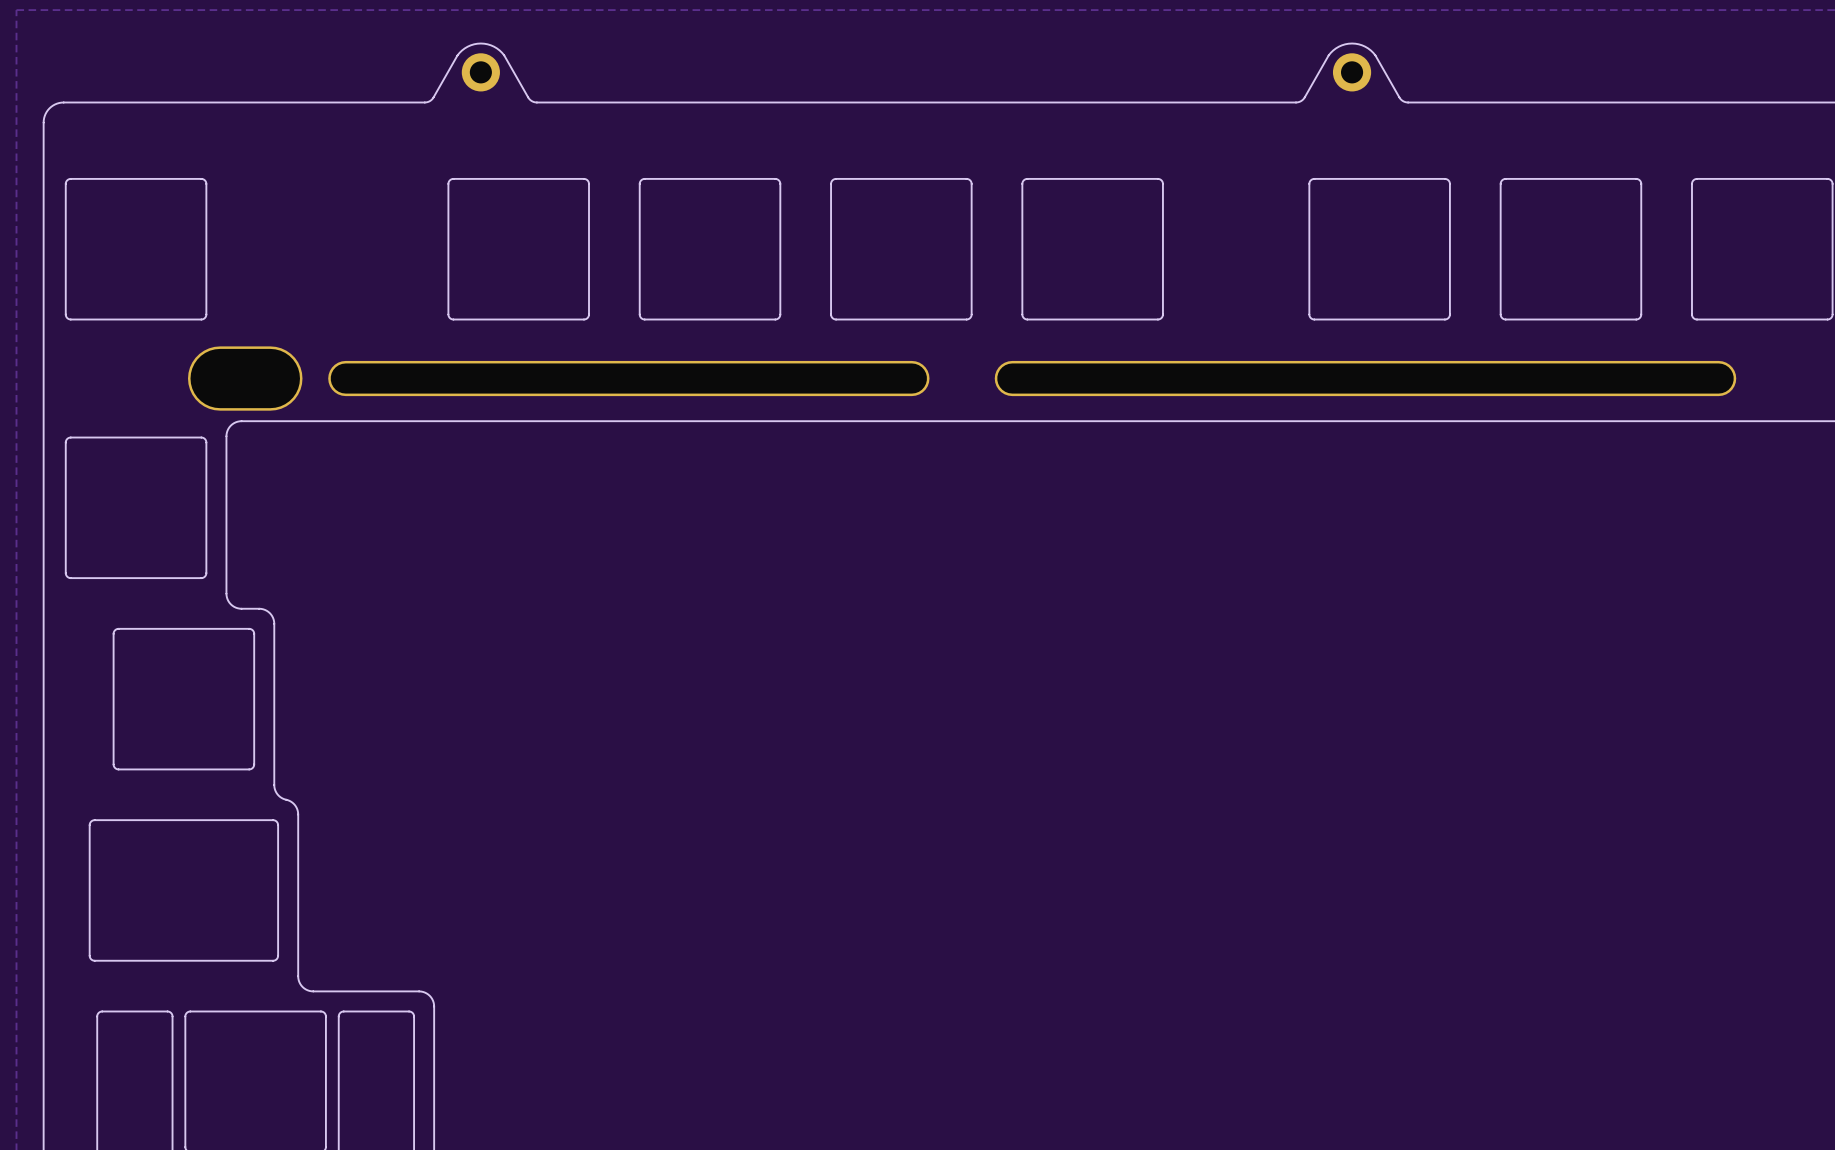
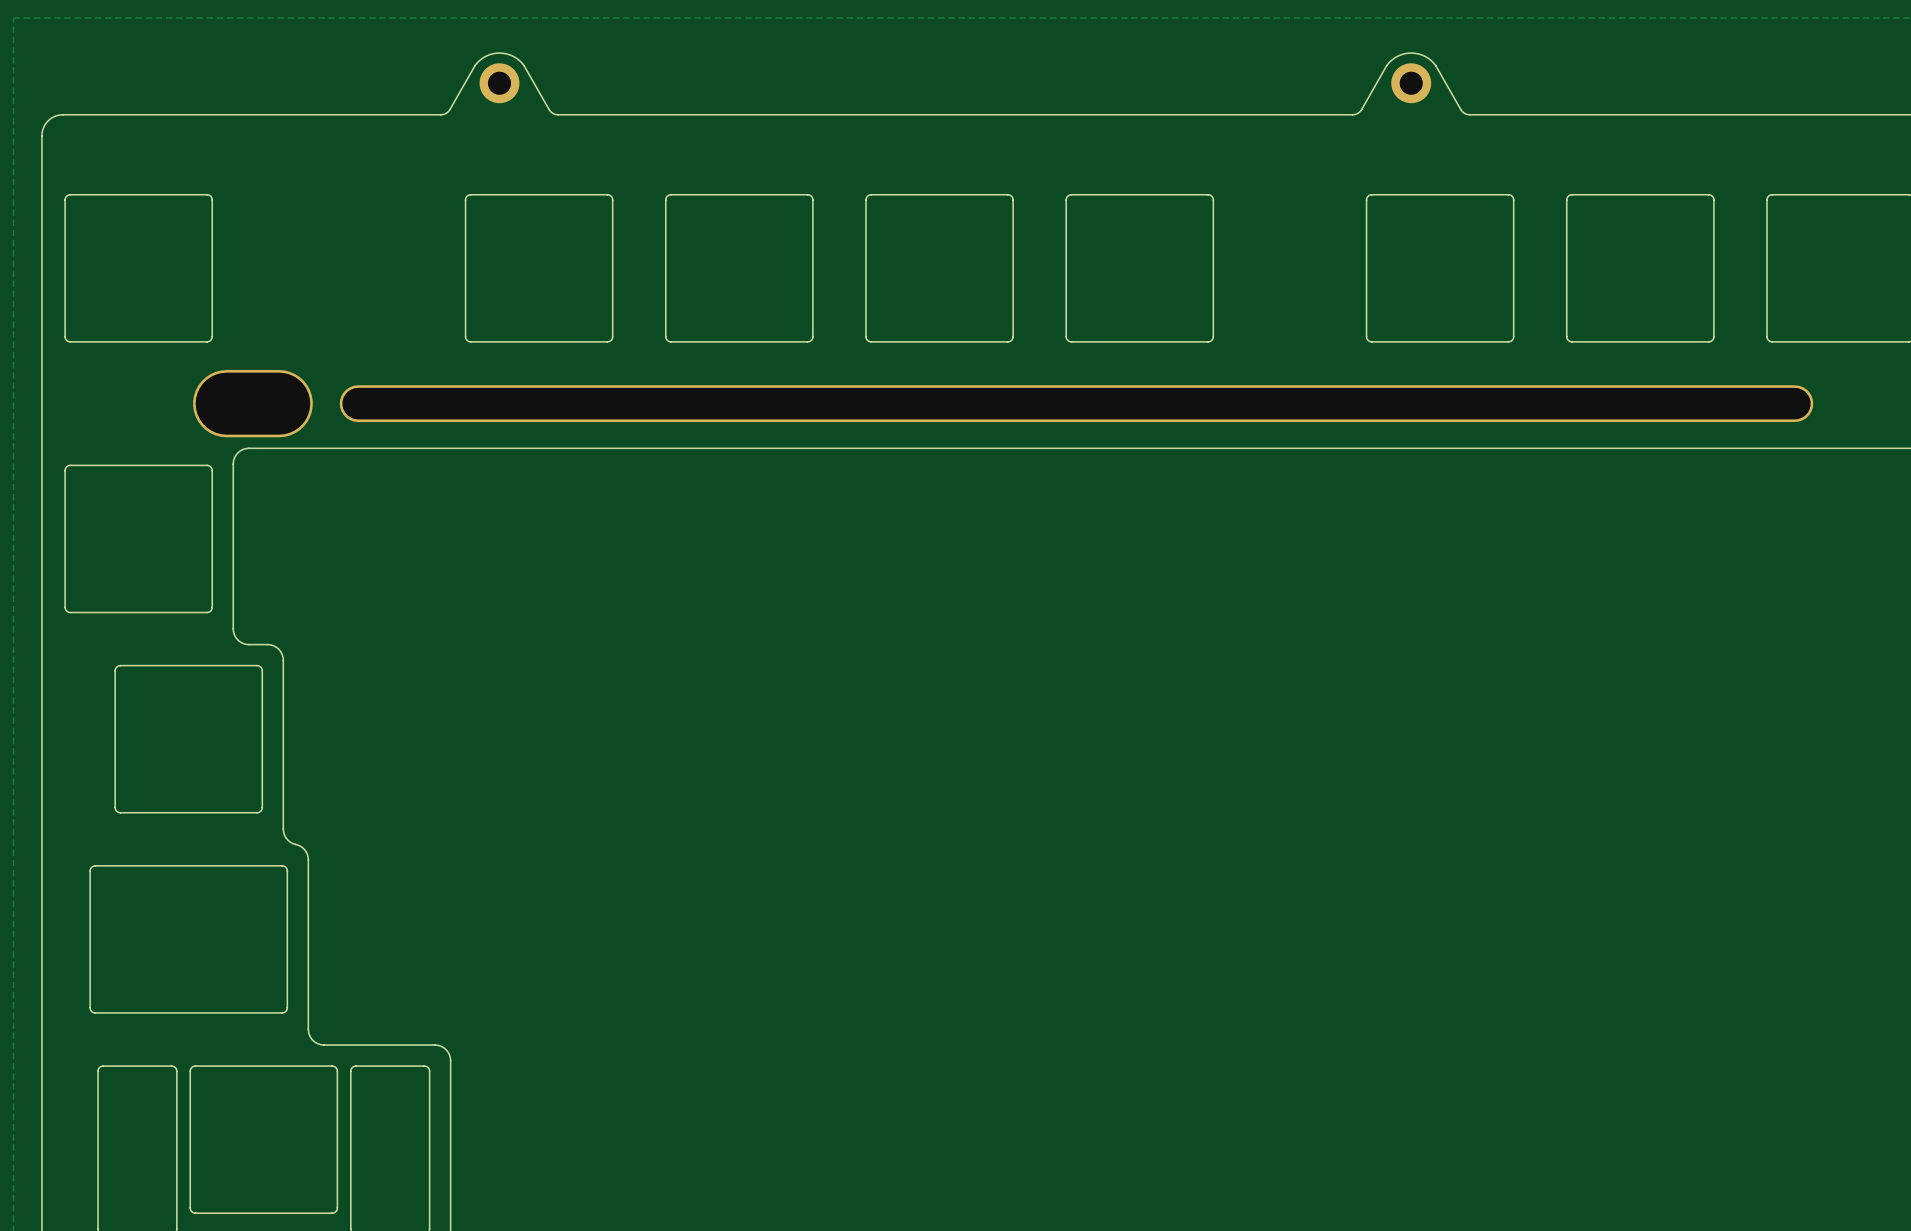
part: (628, 378) -> none
part: none -> (1076, 403)
part: (1365, 378) -> none

